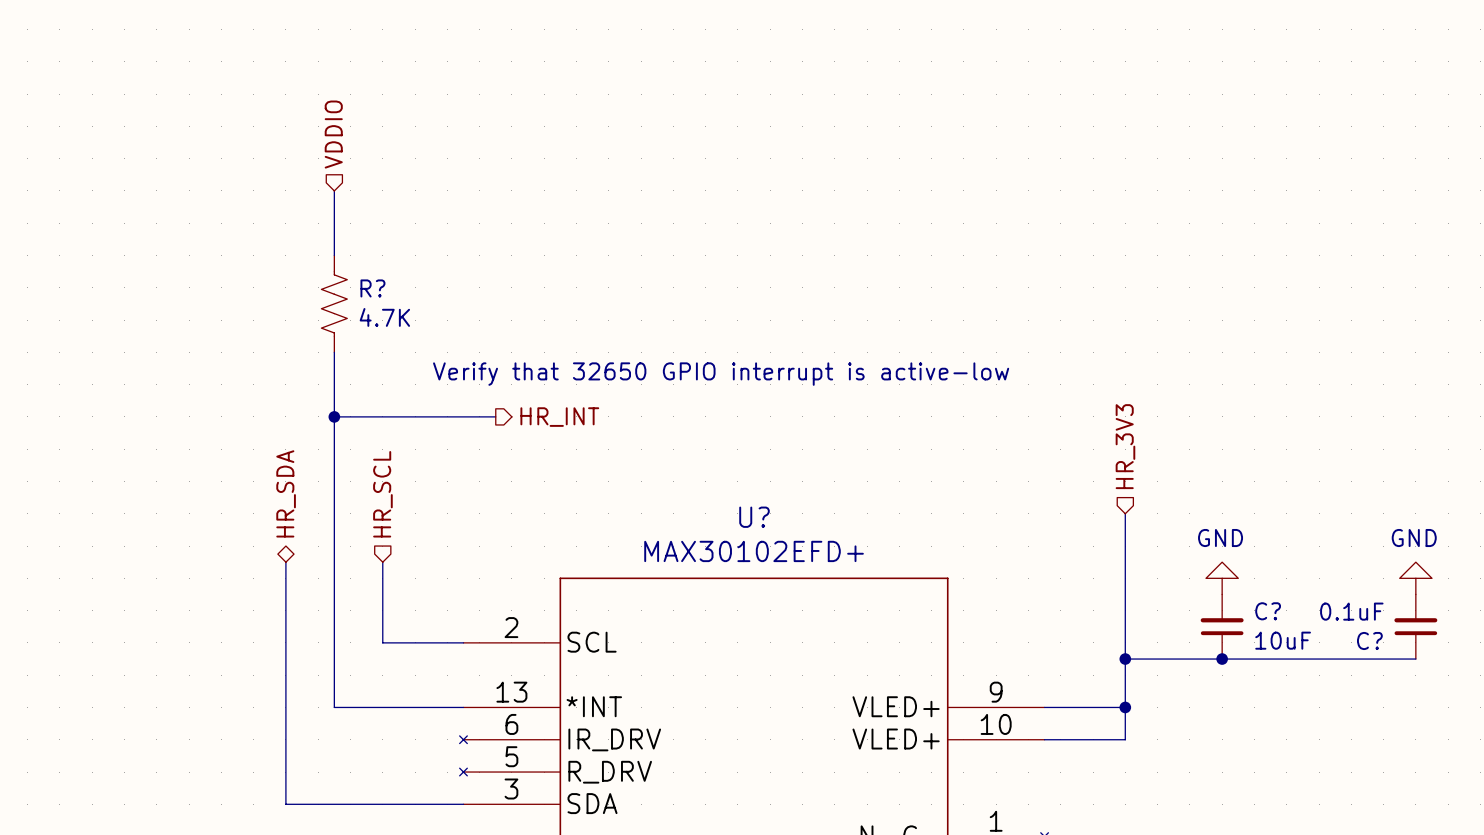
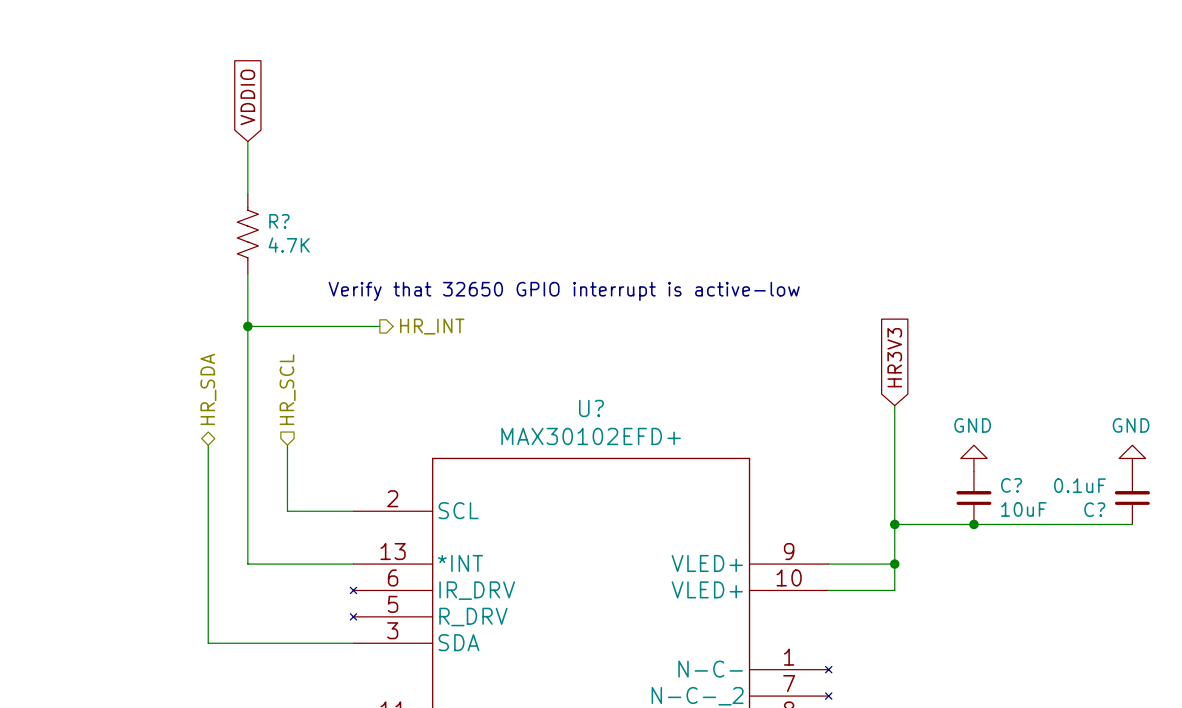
hierarchical label: VDDIO (333, 134) -> none
global label: none -> VDDIO (247, 97)
hierarchical label: HR_3V3 (1125, 446) -> none
global label: none -> HR3V3 (894, 357)

